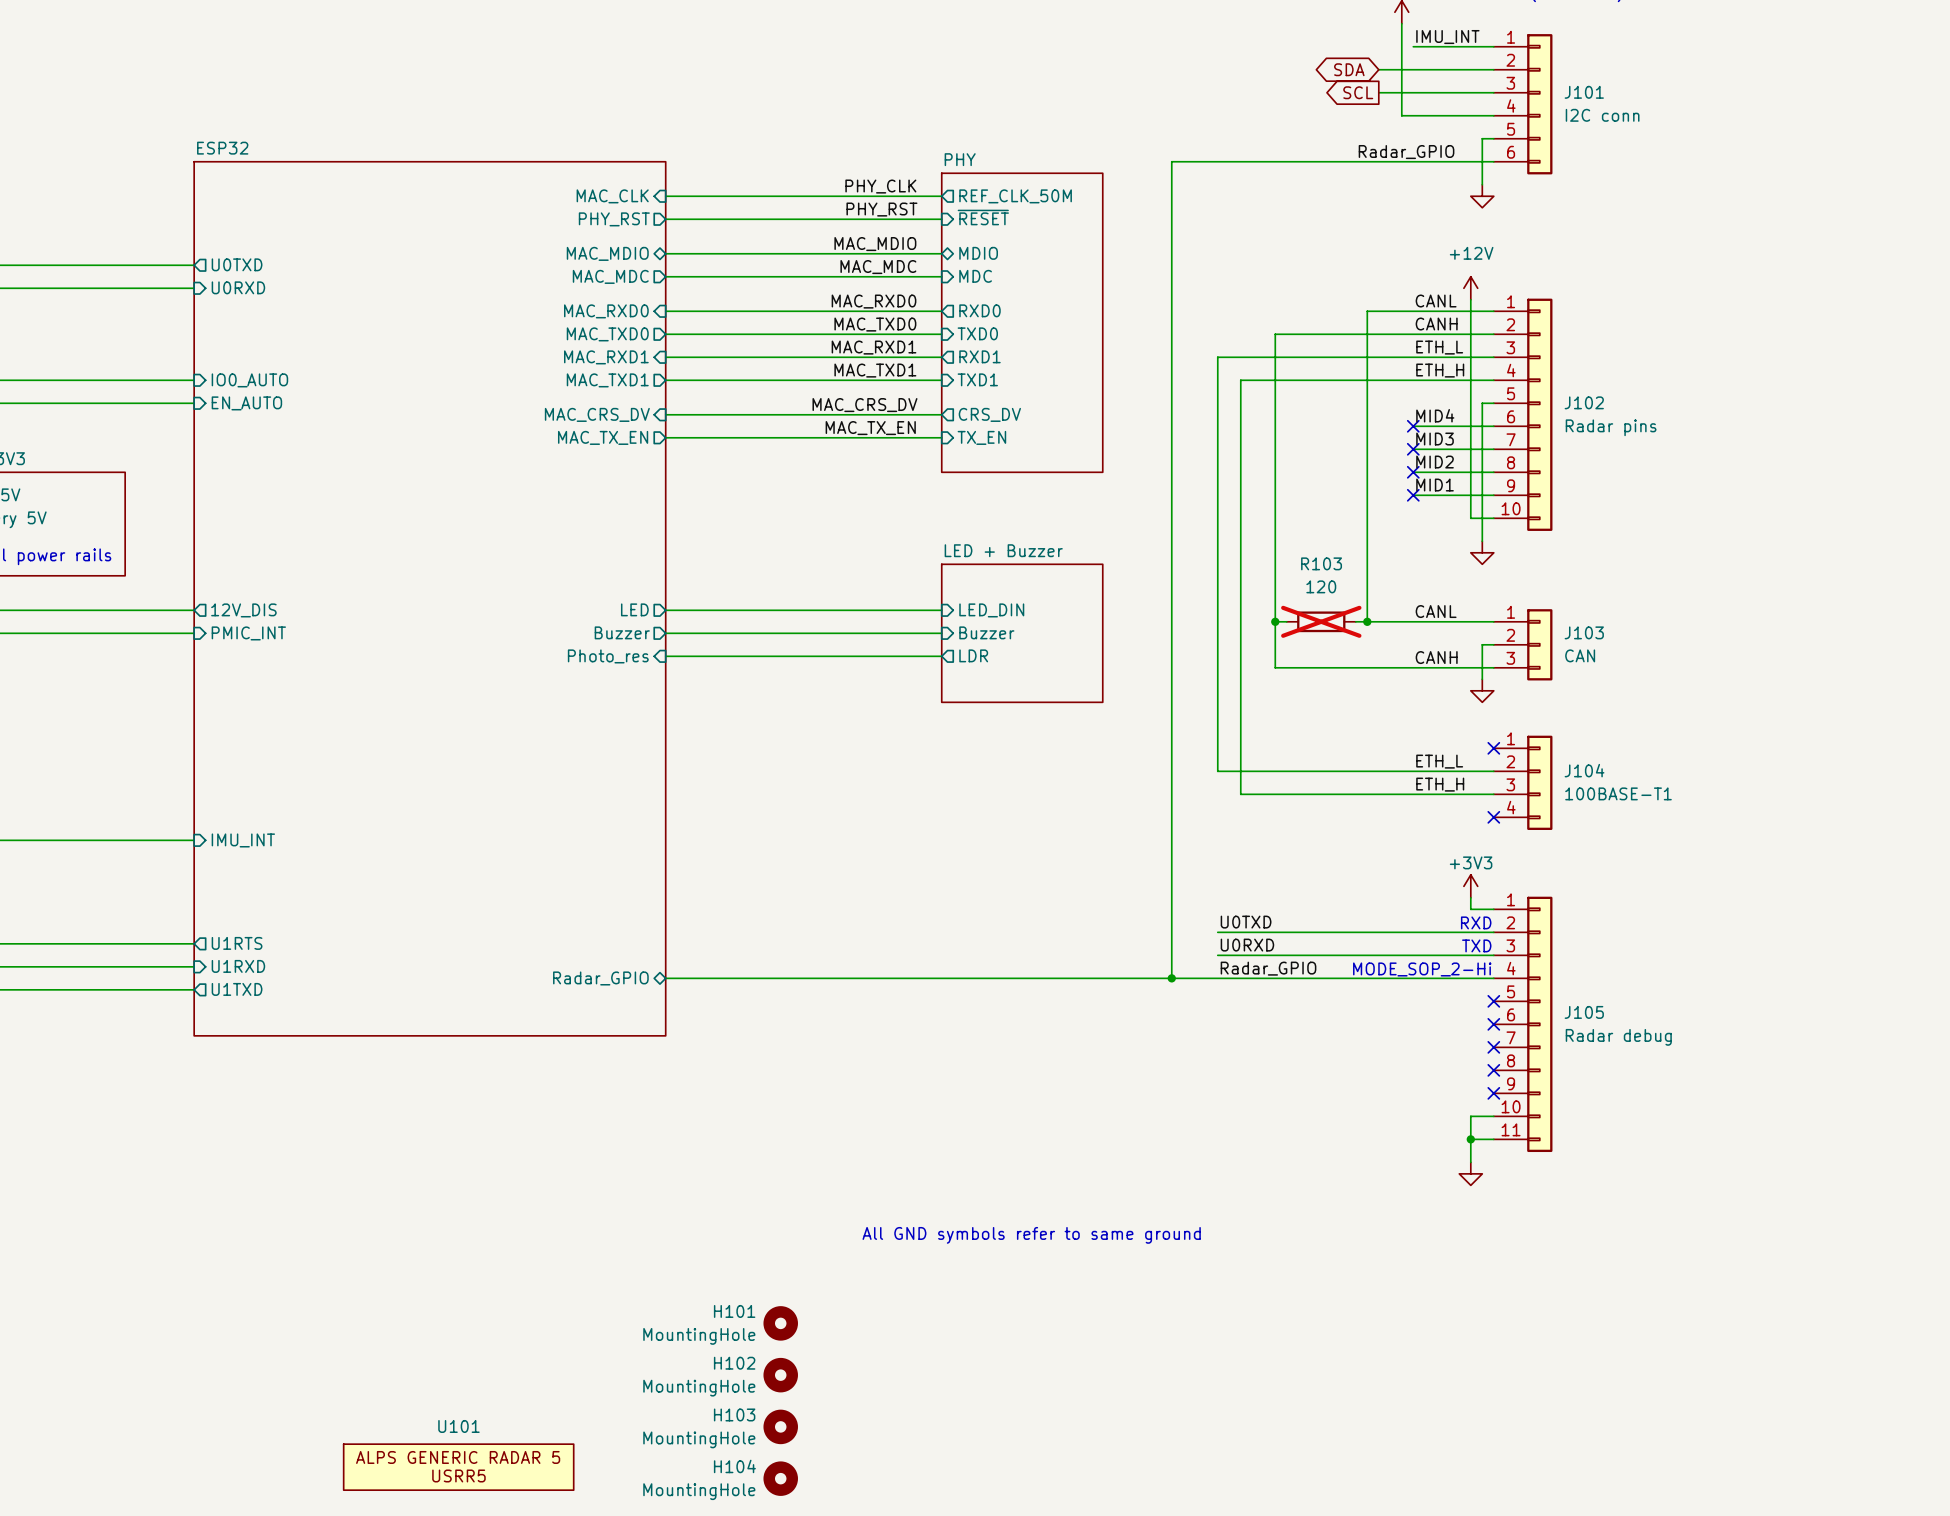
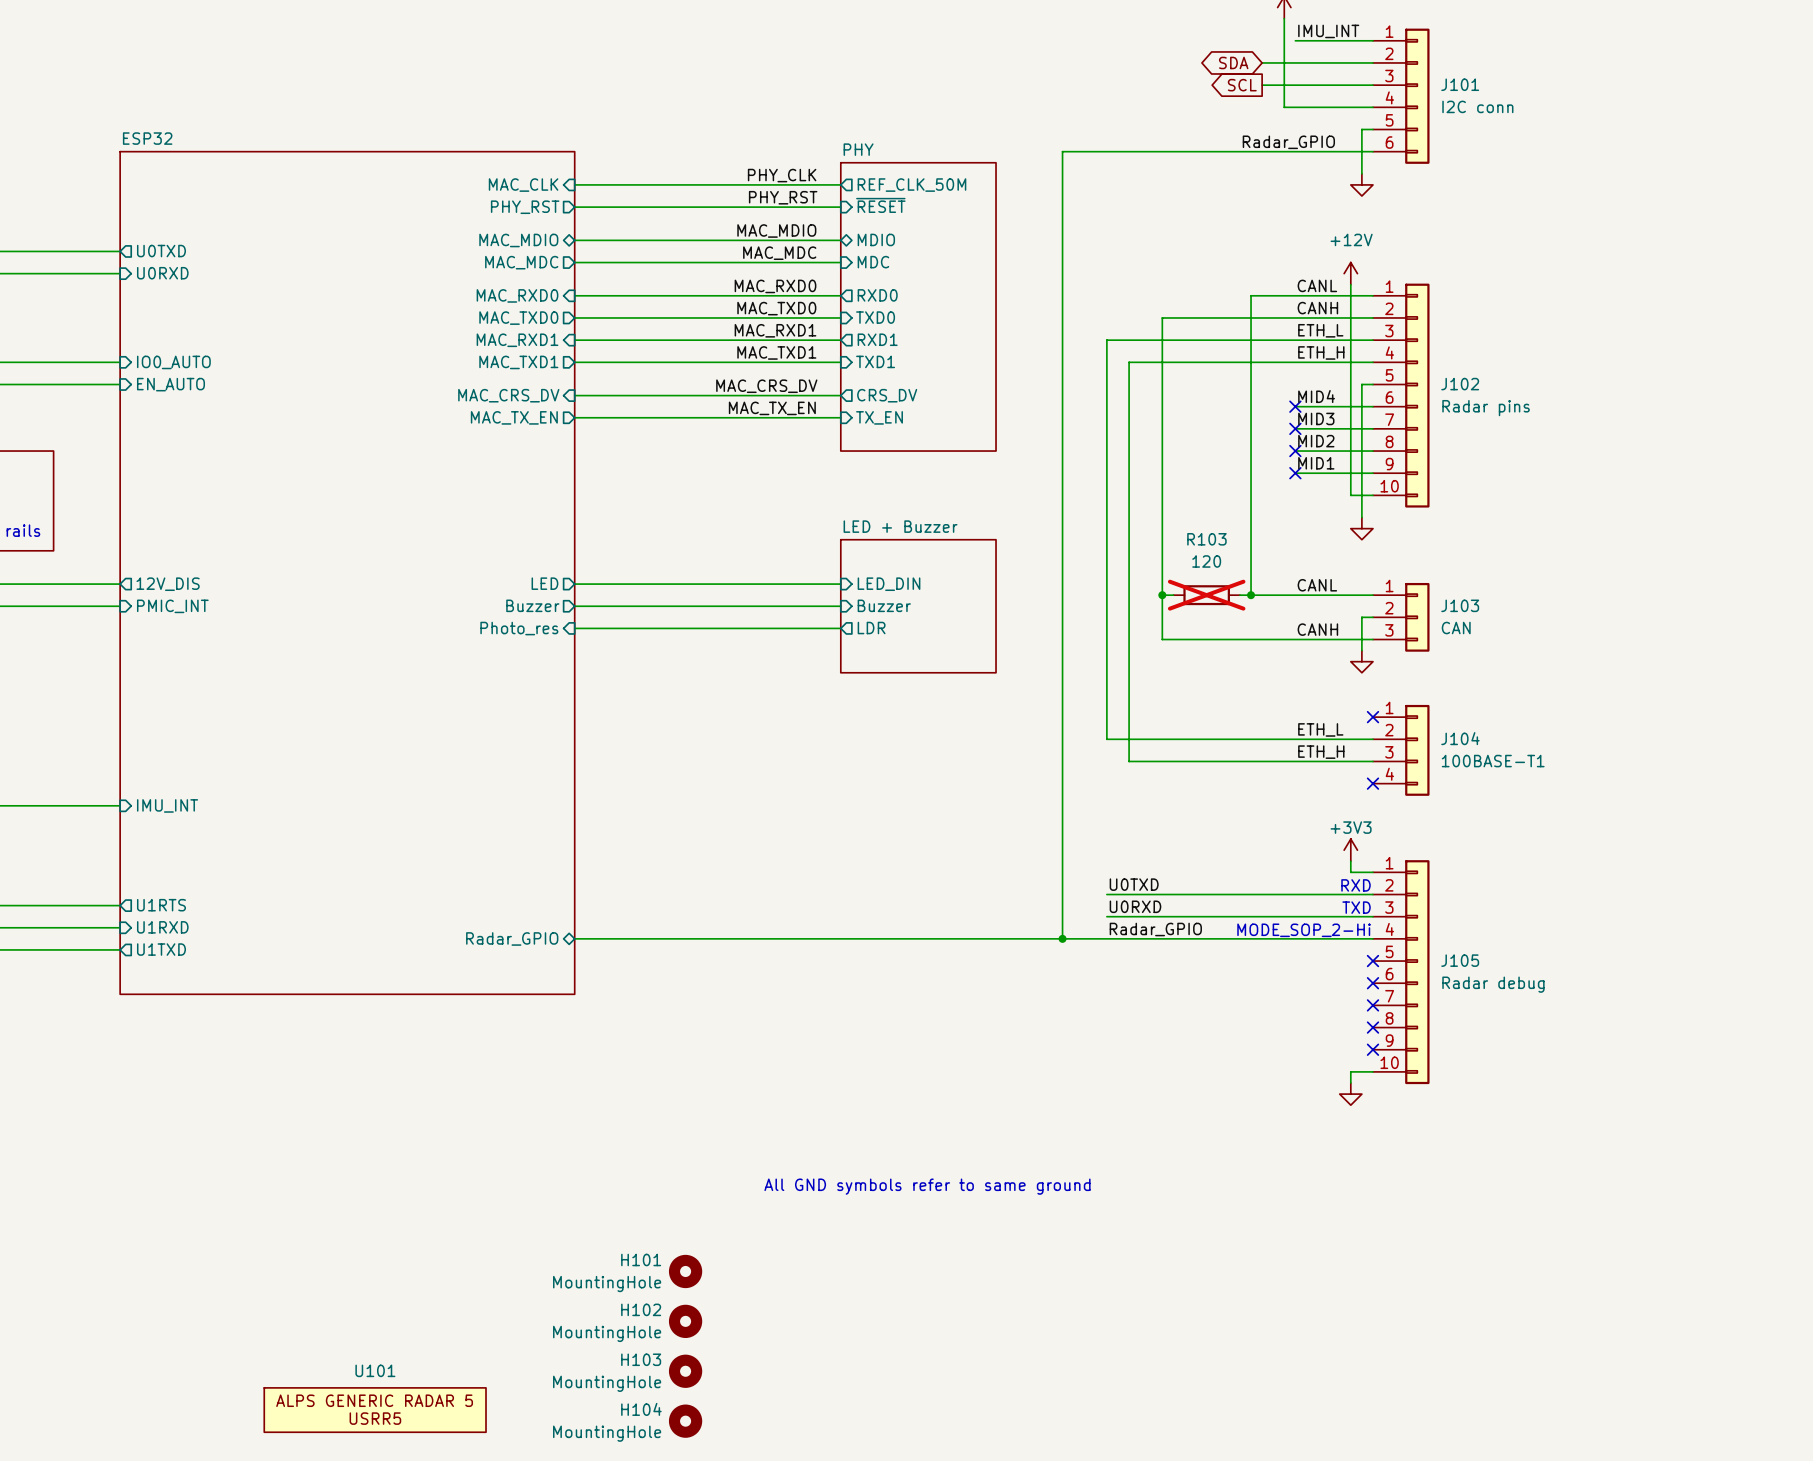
J105 symbol: [1493, 896, 1553, 1153] -> [1372, 860, 1430, 1085]
wire: (1470, 1127) (1470, 1162) -> none
wire: (1470, 1139) (1493, 1139) -> none
junction: (1470, 1139) -> none
power symbol position: (1470, 1173) -> (1350, 1094)

